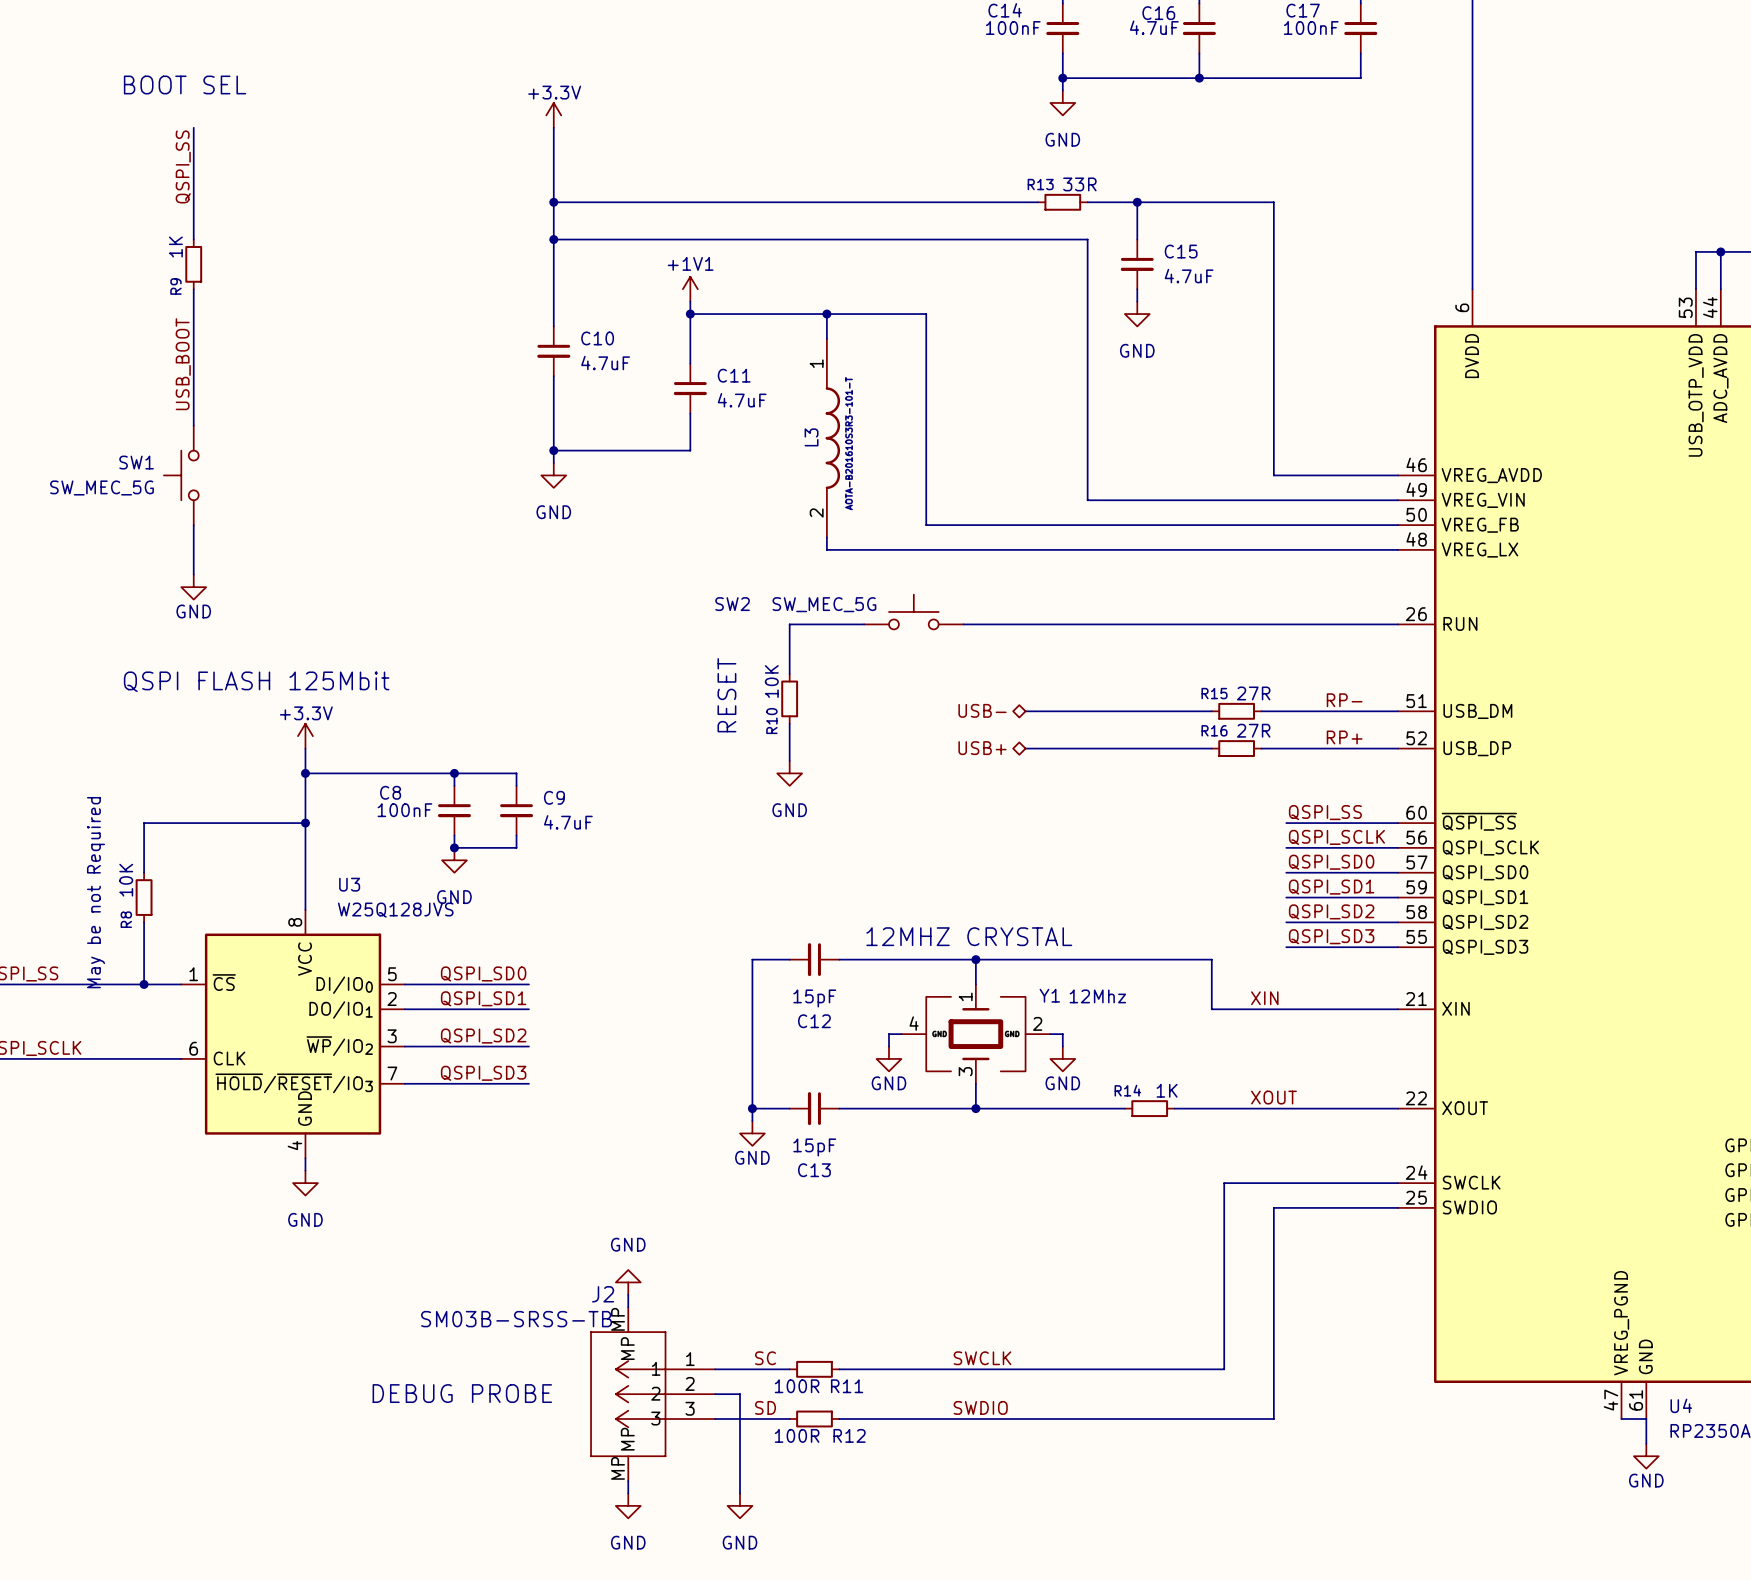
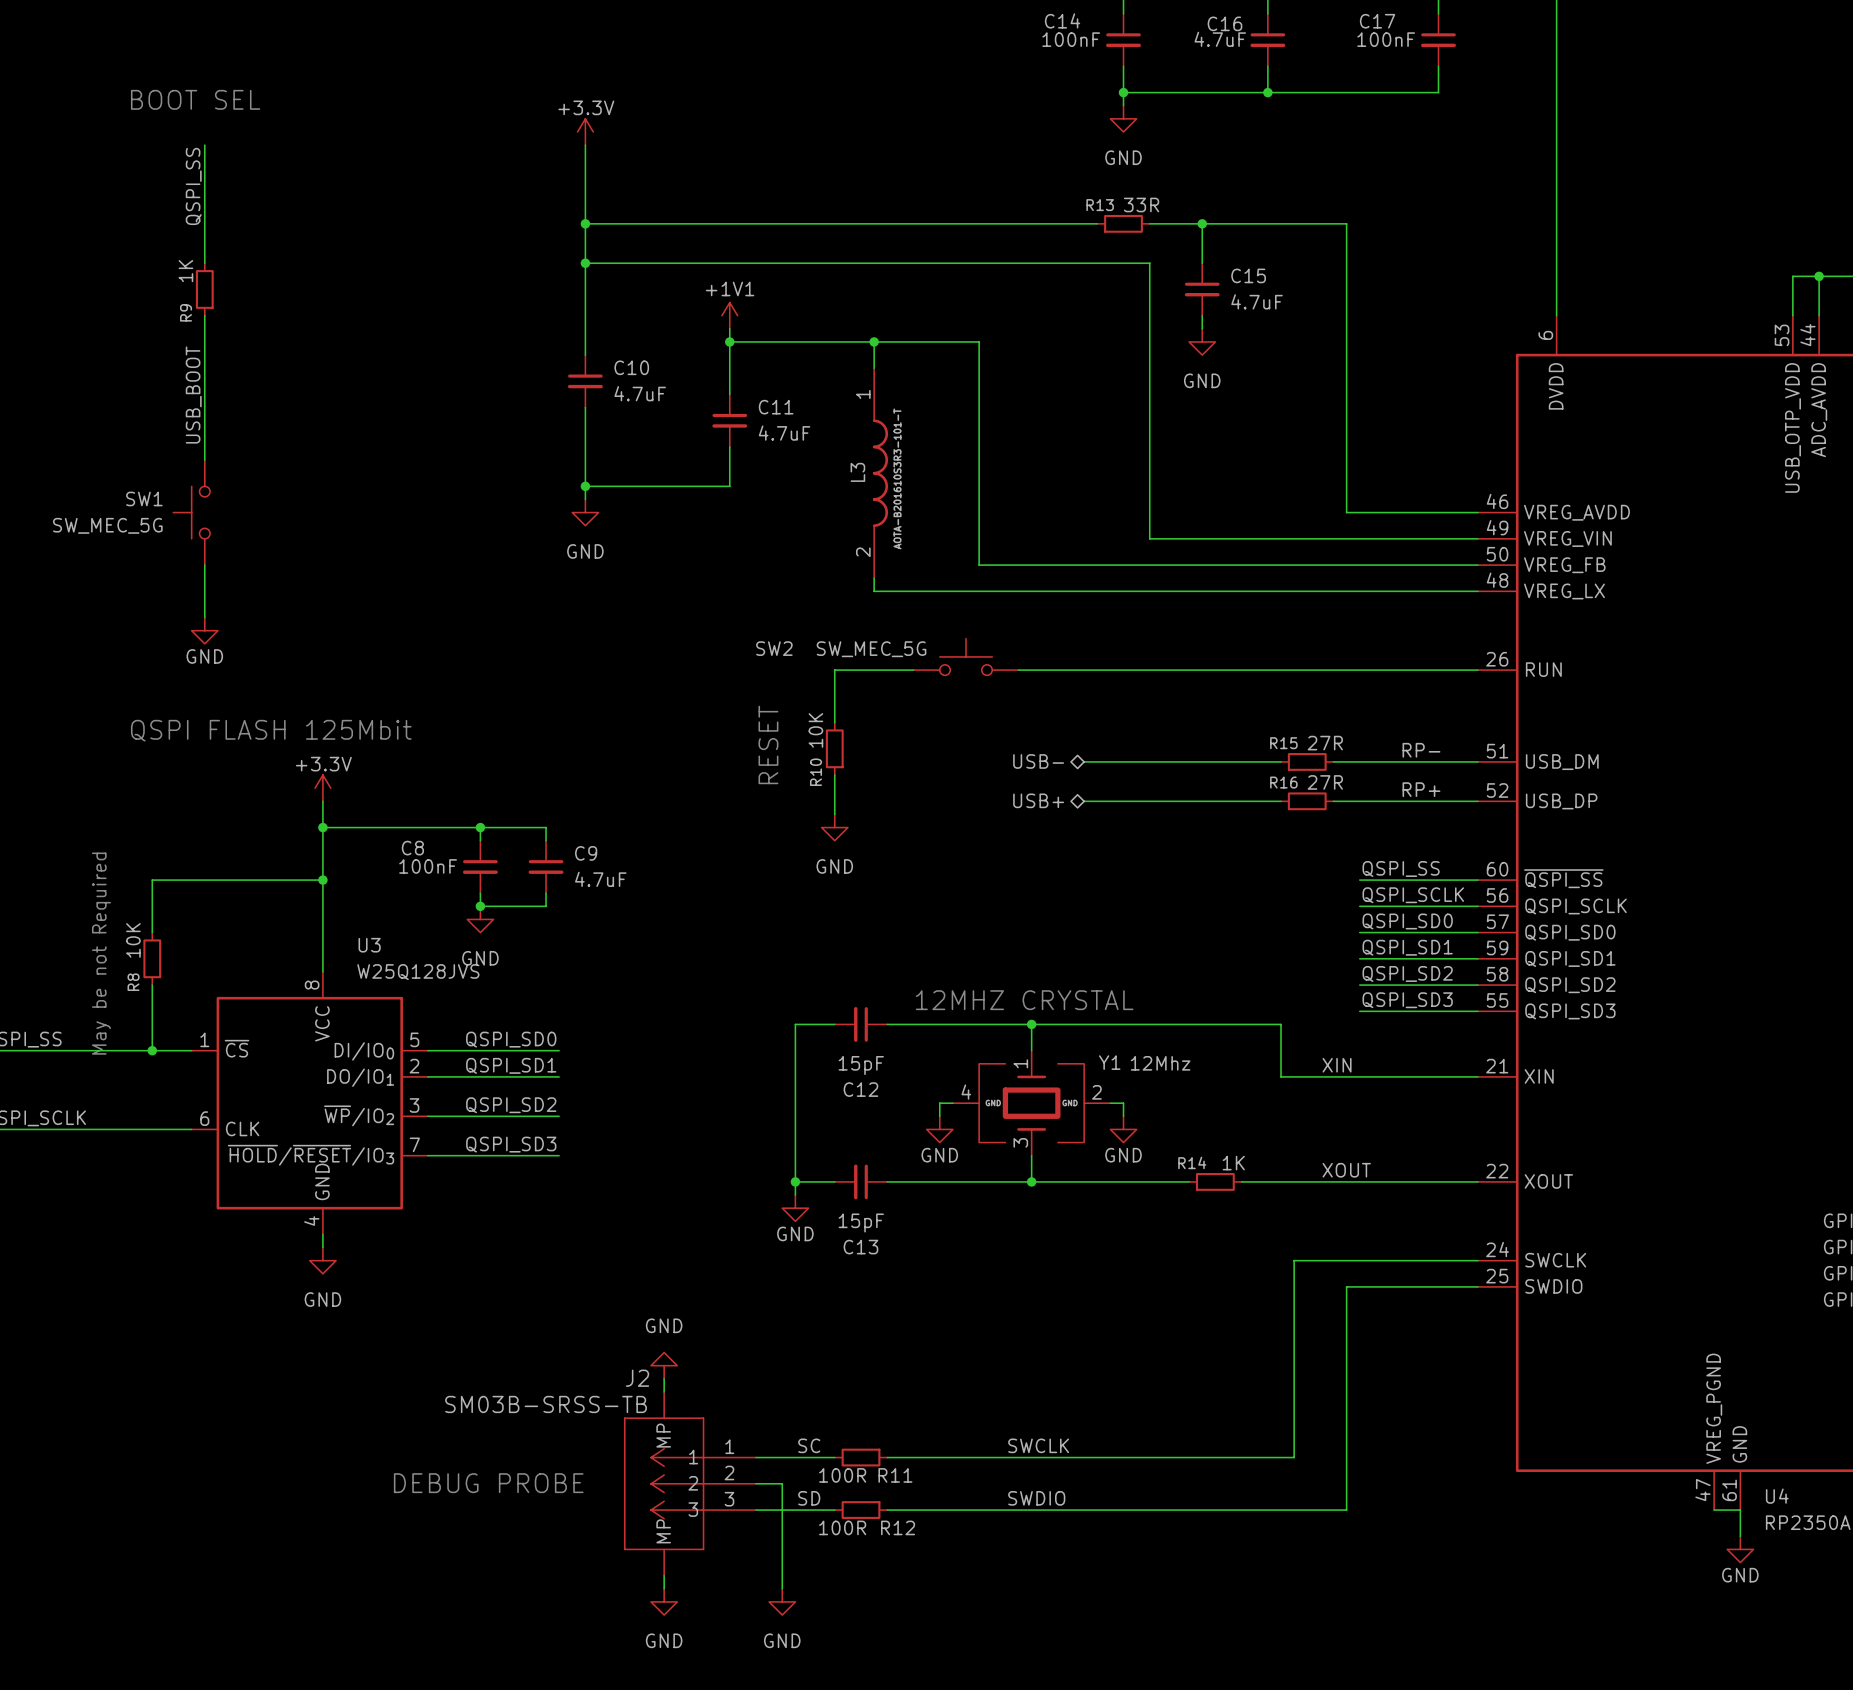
J2 pin number: MP (618, 1319) -> none
J2 pin number: MP (618, 1468) -> none

